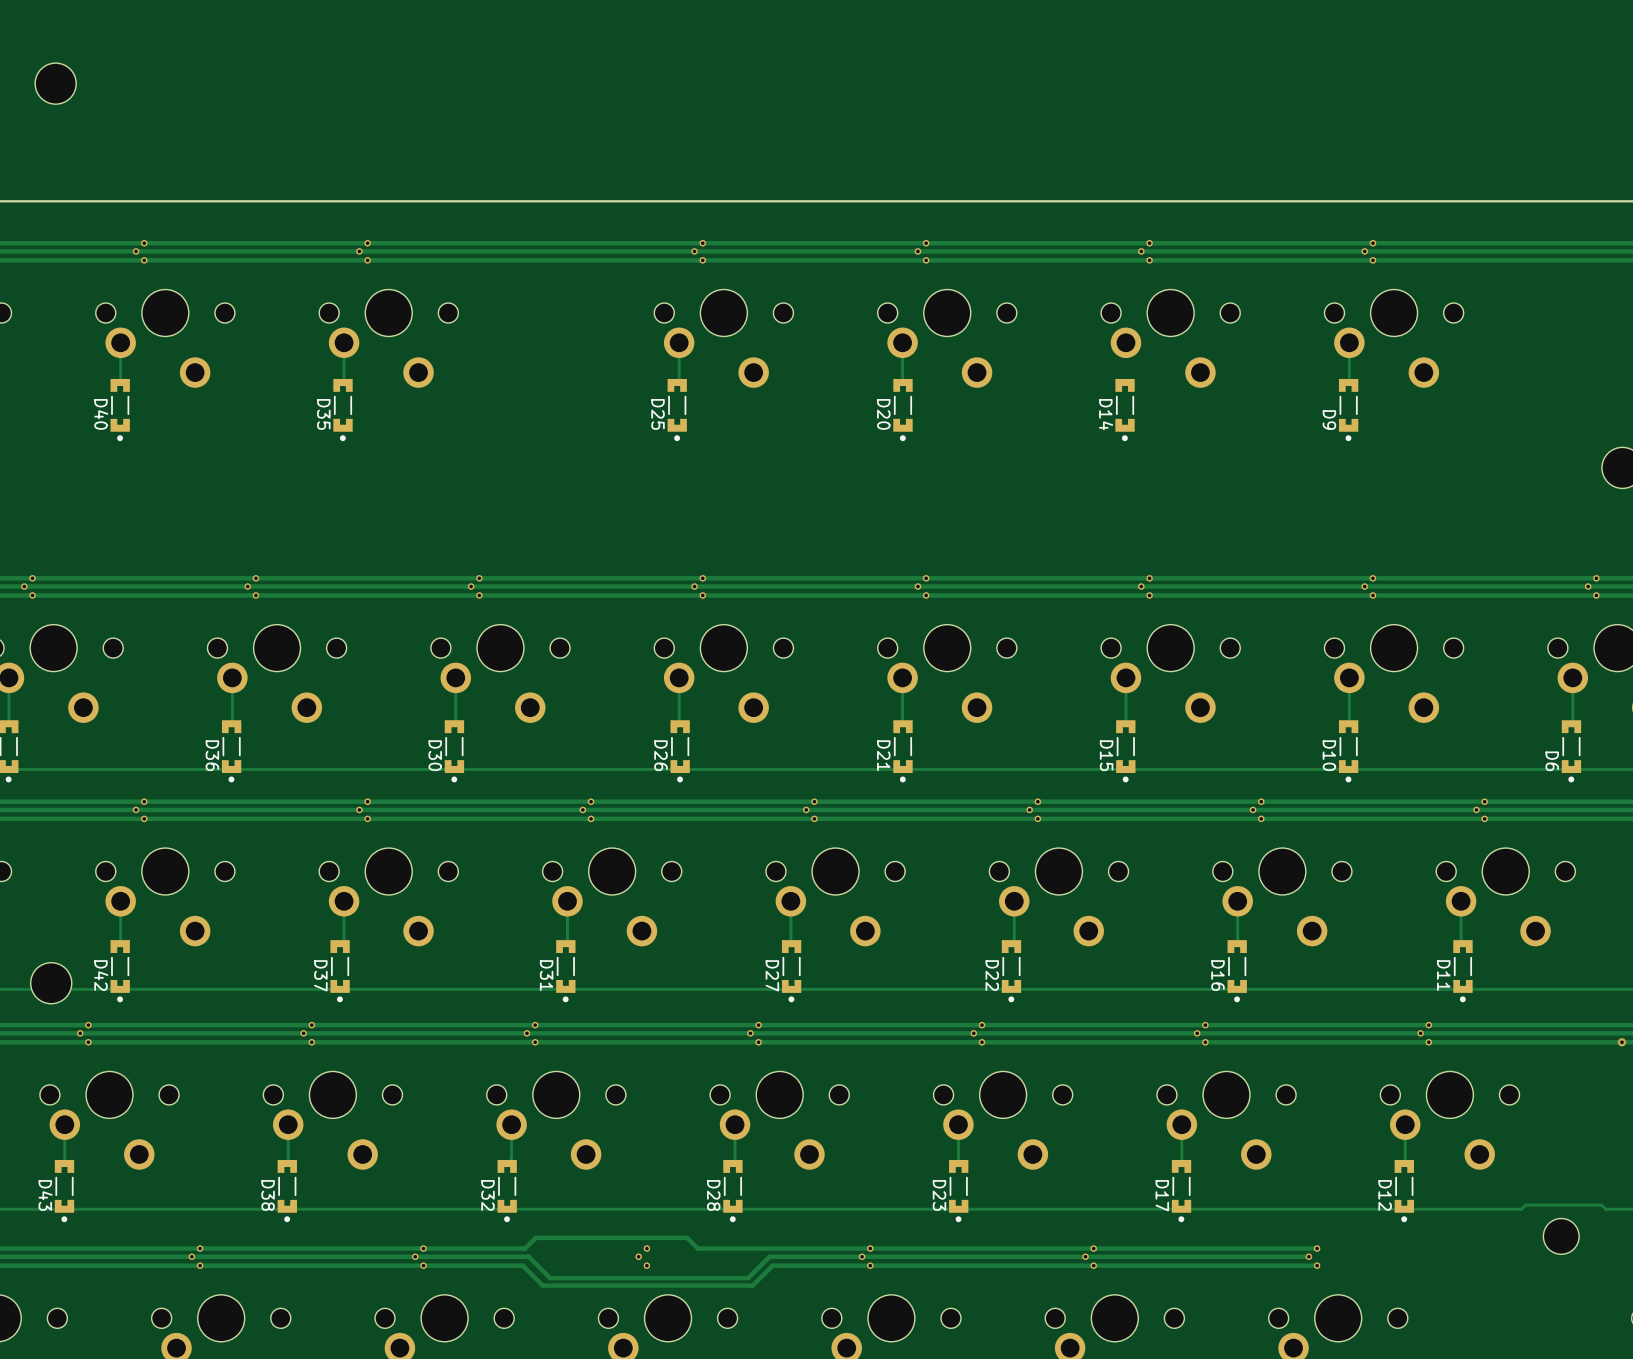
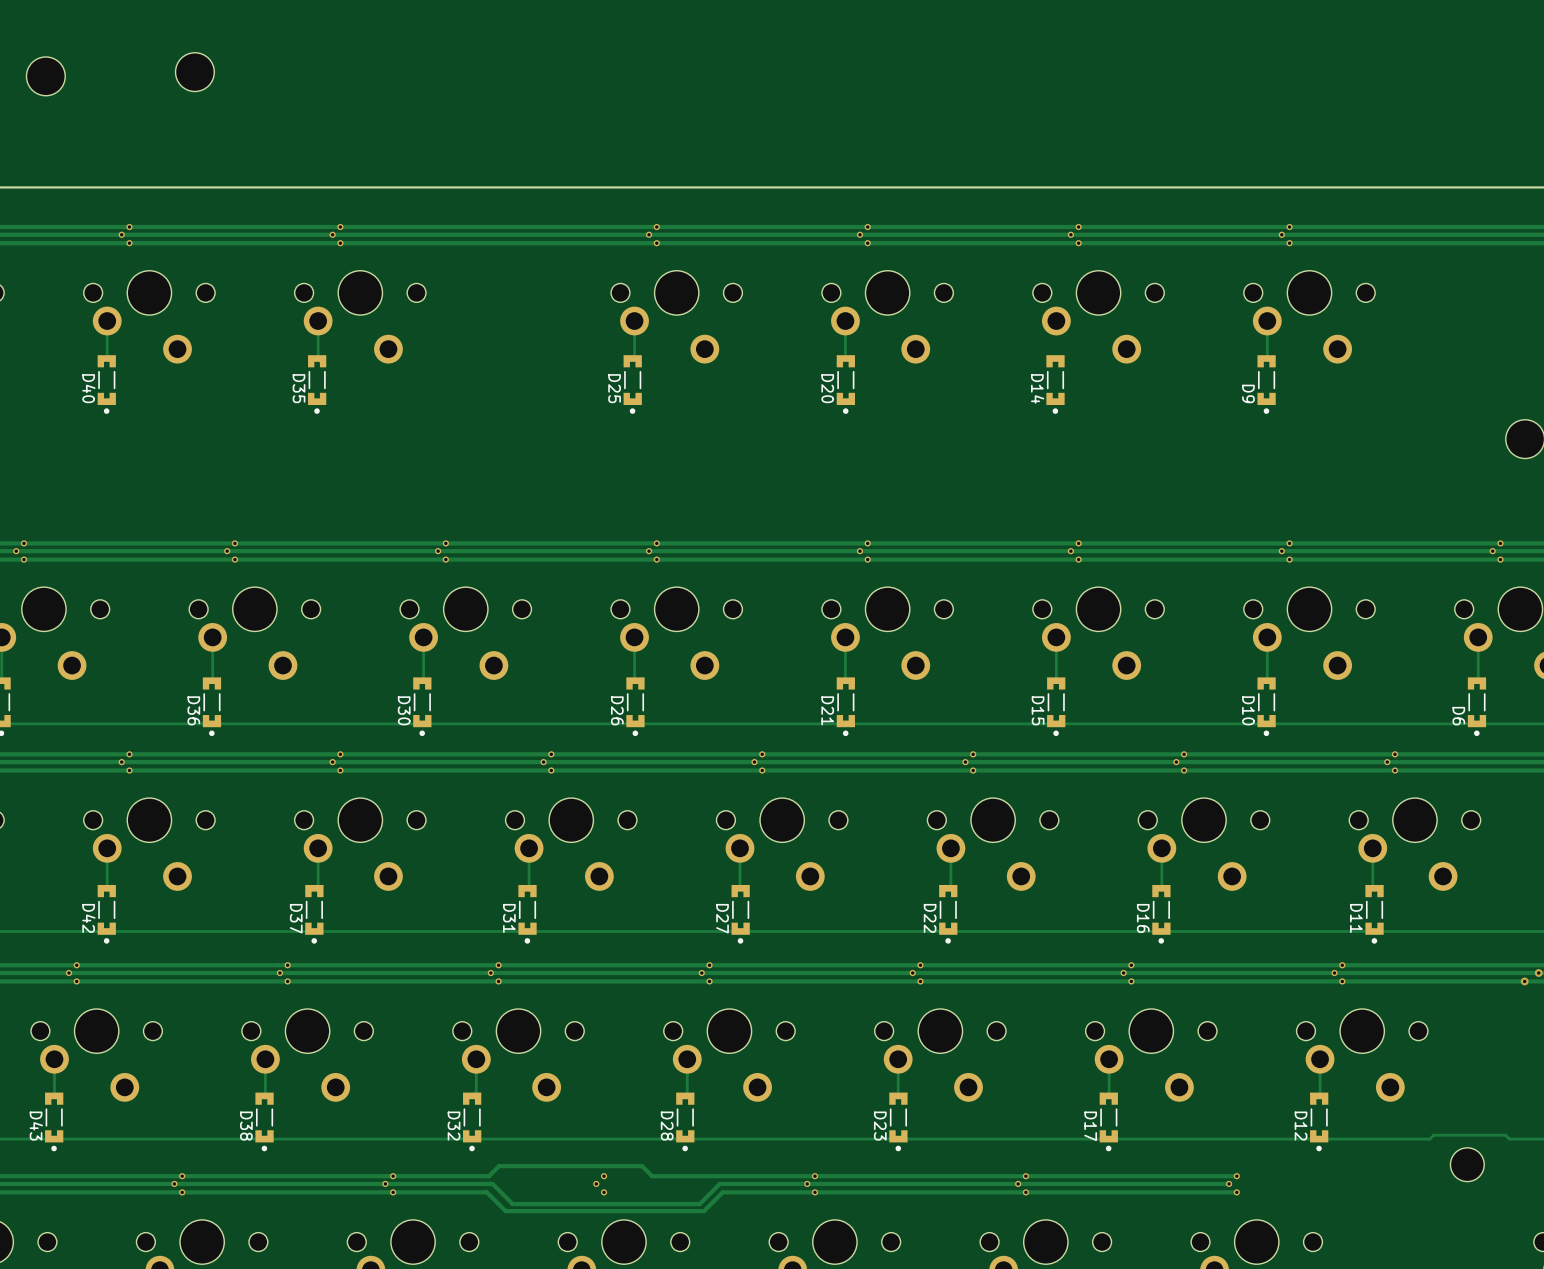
part: none -> (194, 72)
part: (51, 983) -> none

